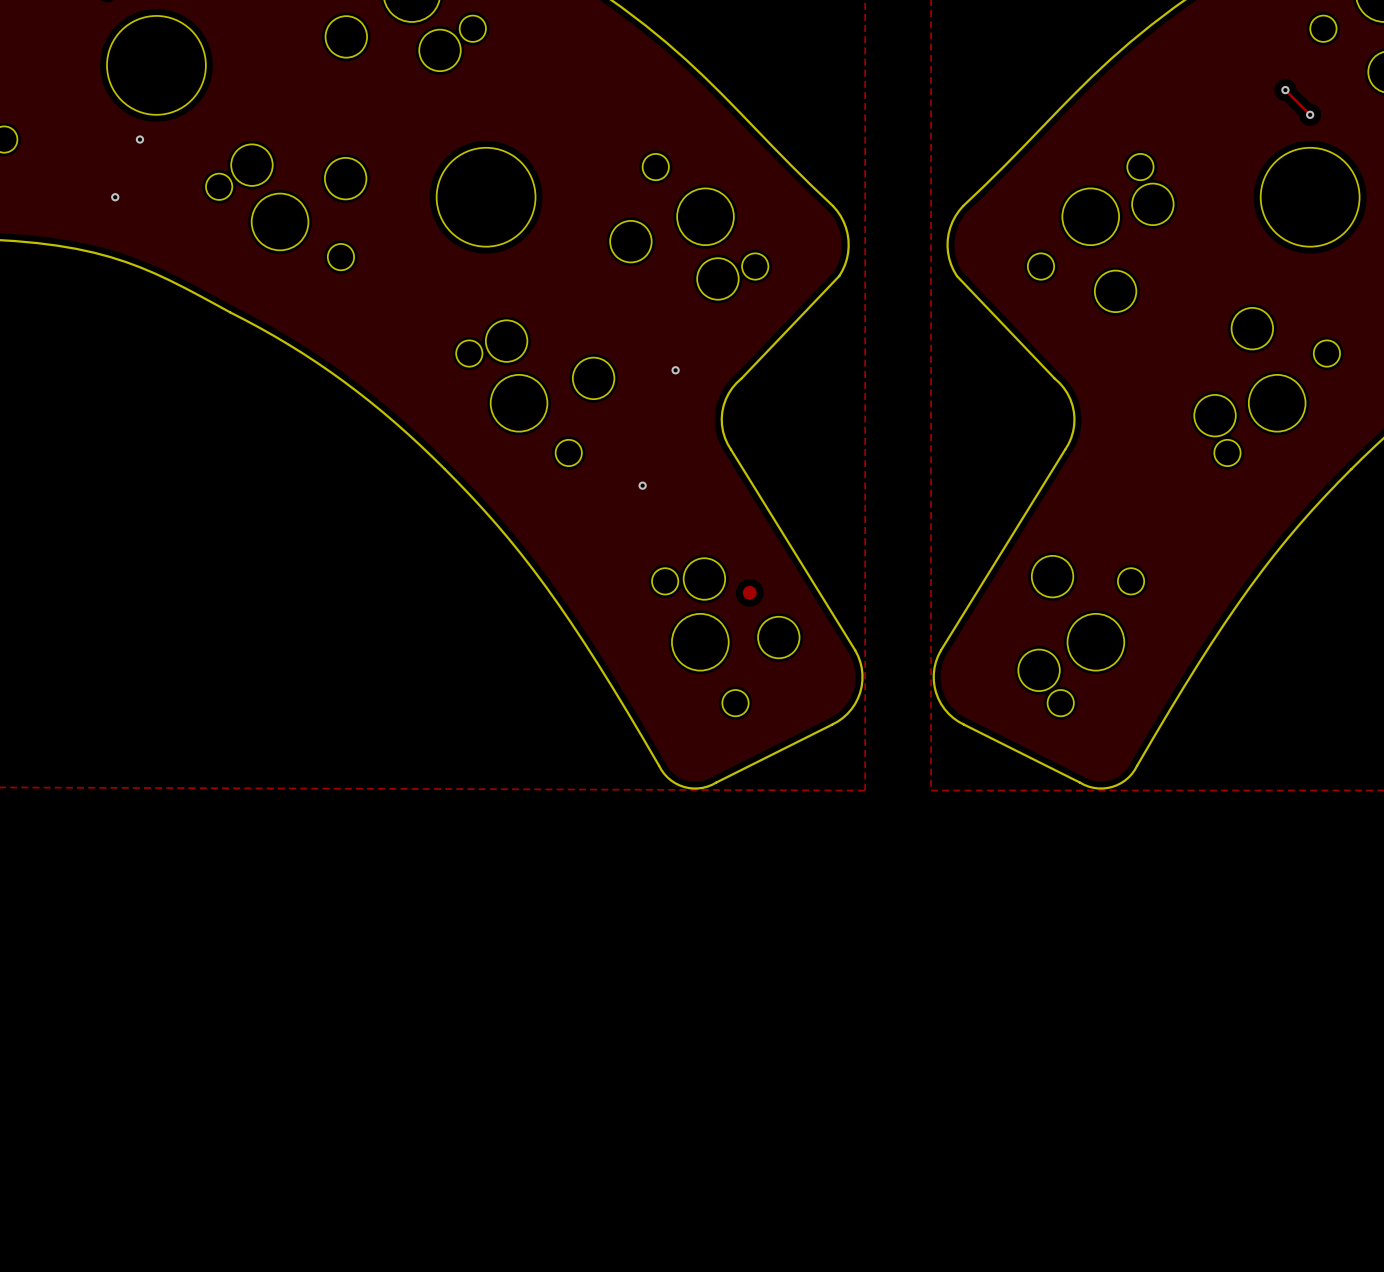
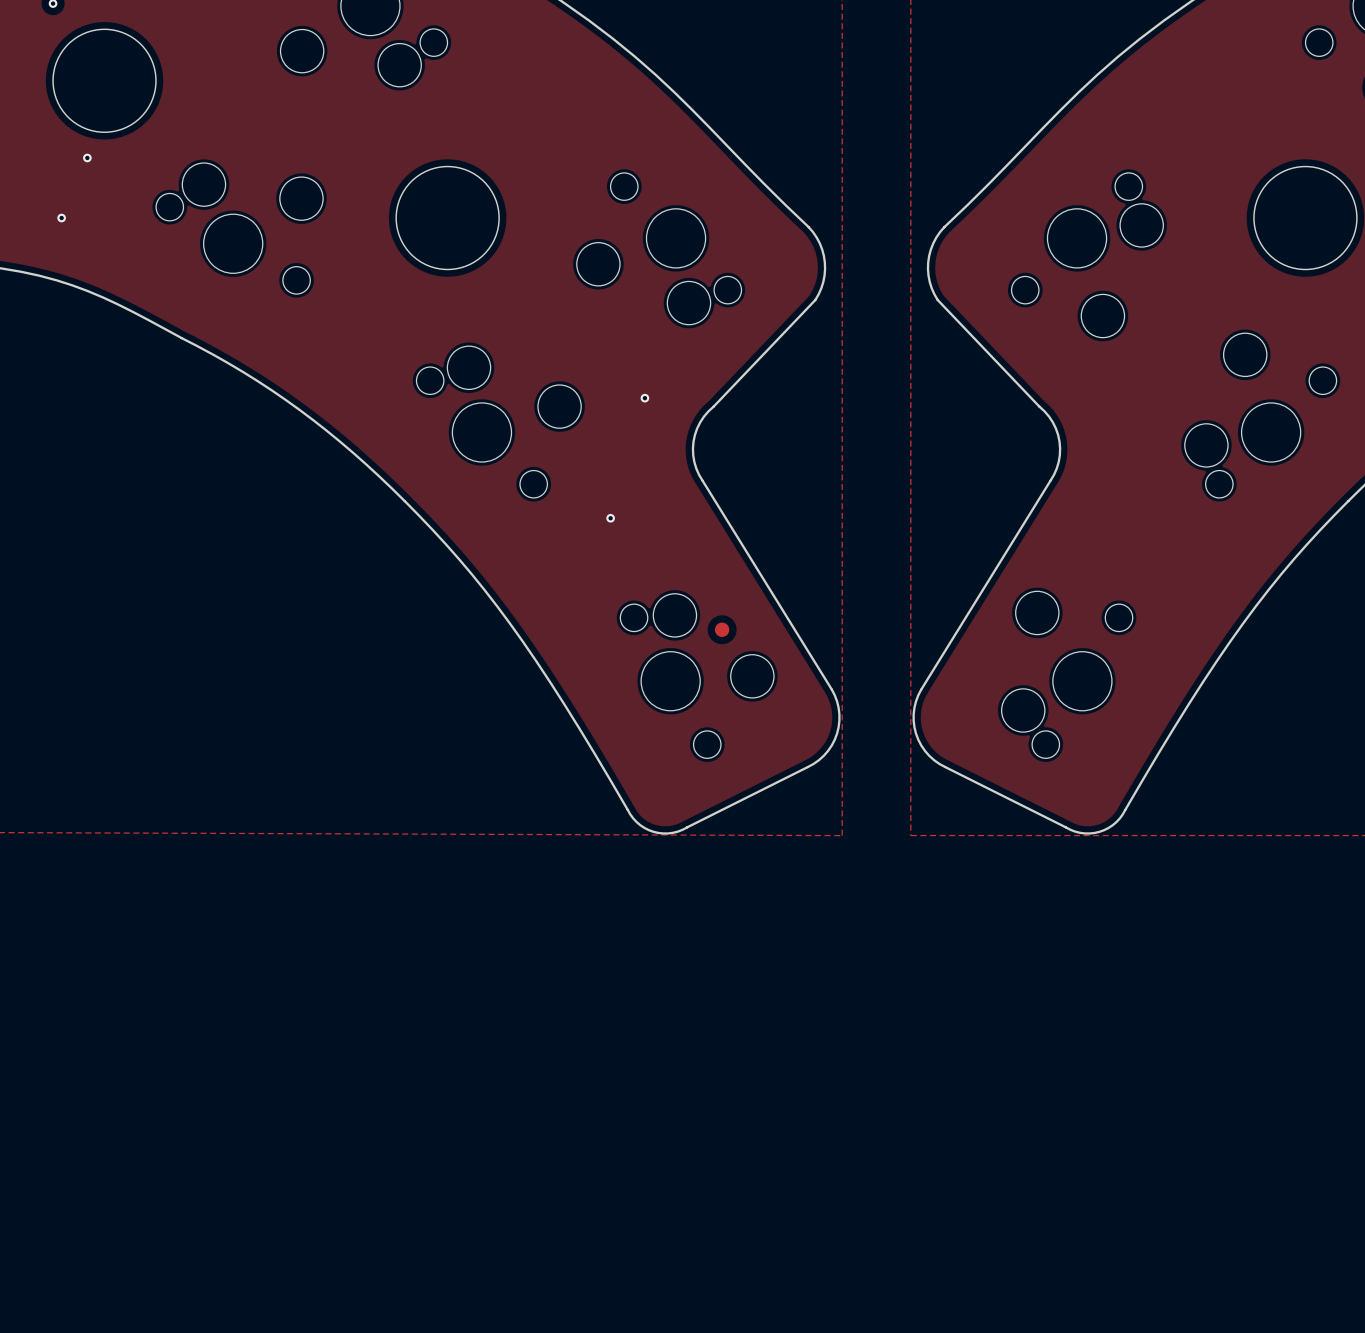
track: (1285, 90) (1310, 114) -> none
via: (1285, 90) -> none
via: (1310, 114) -> none

